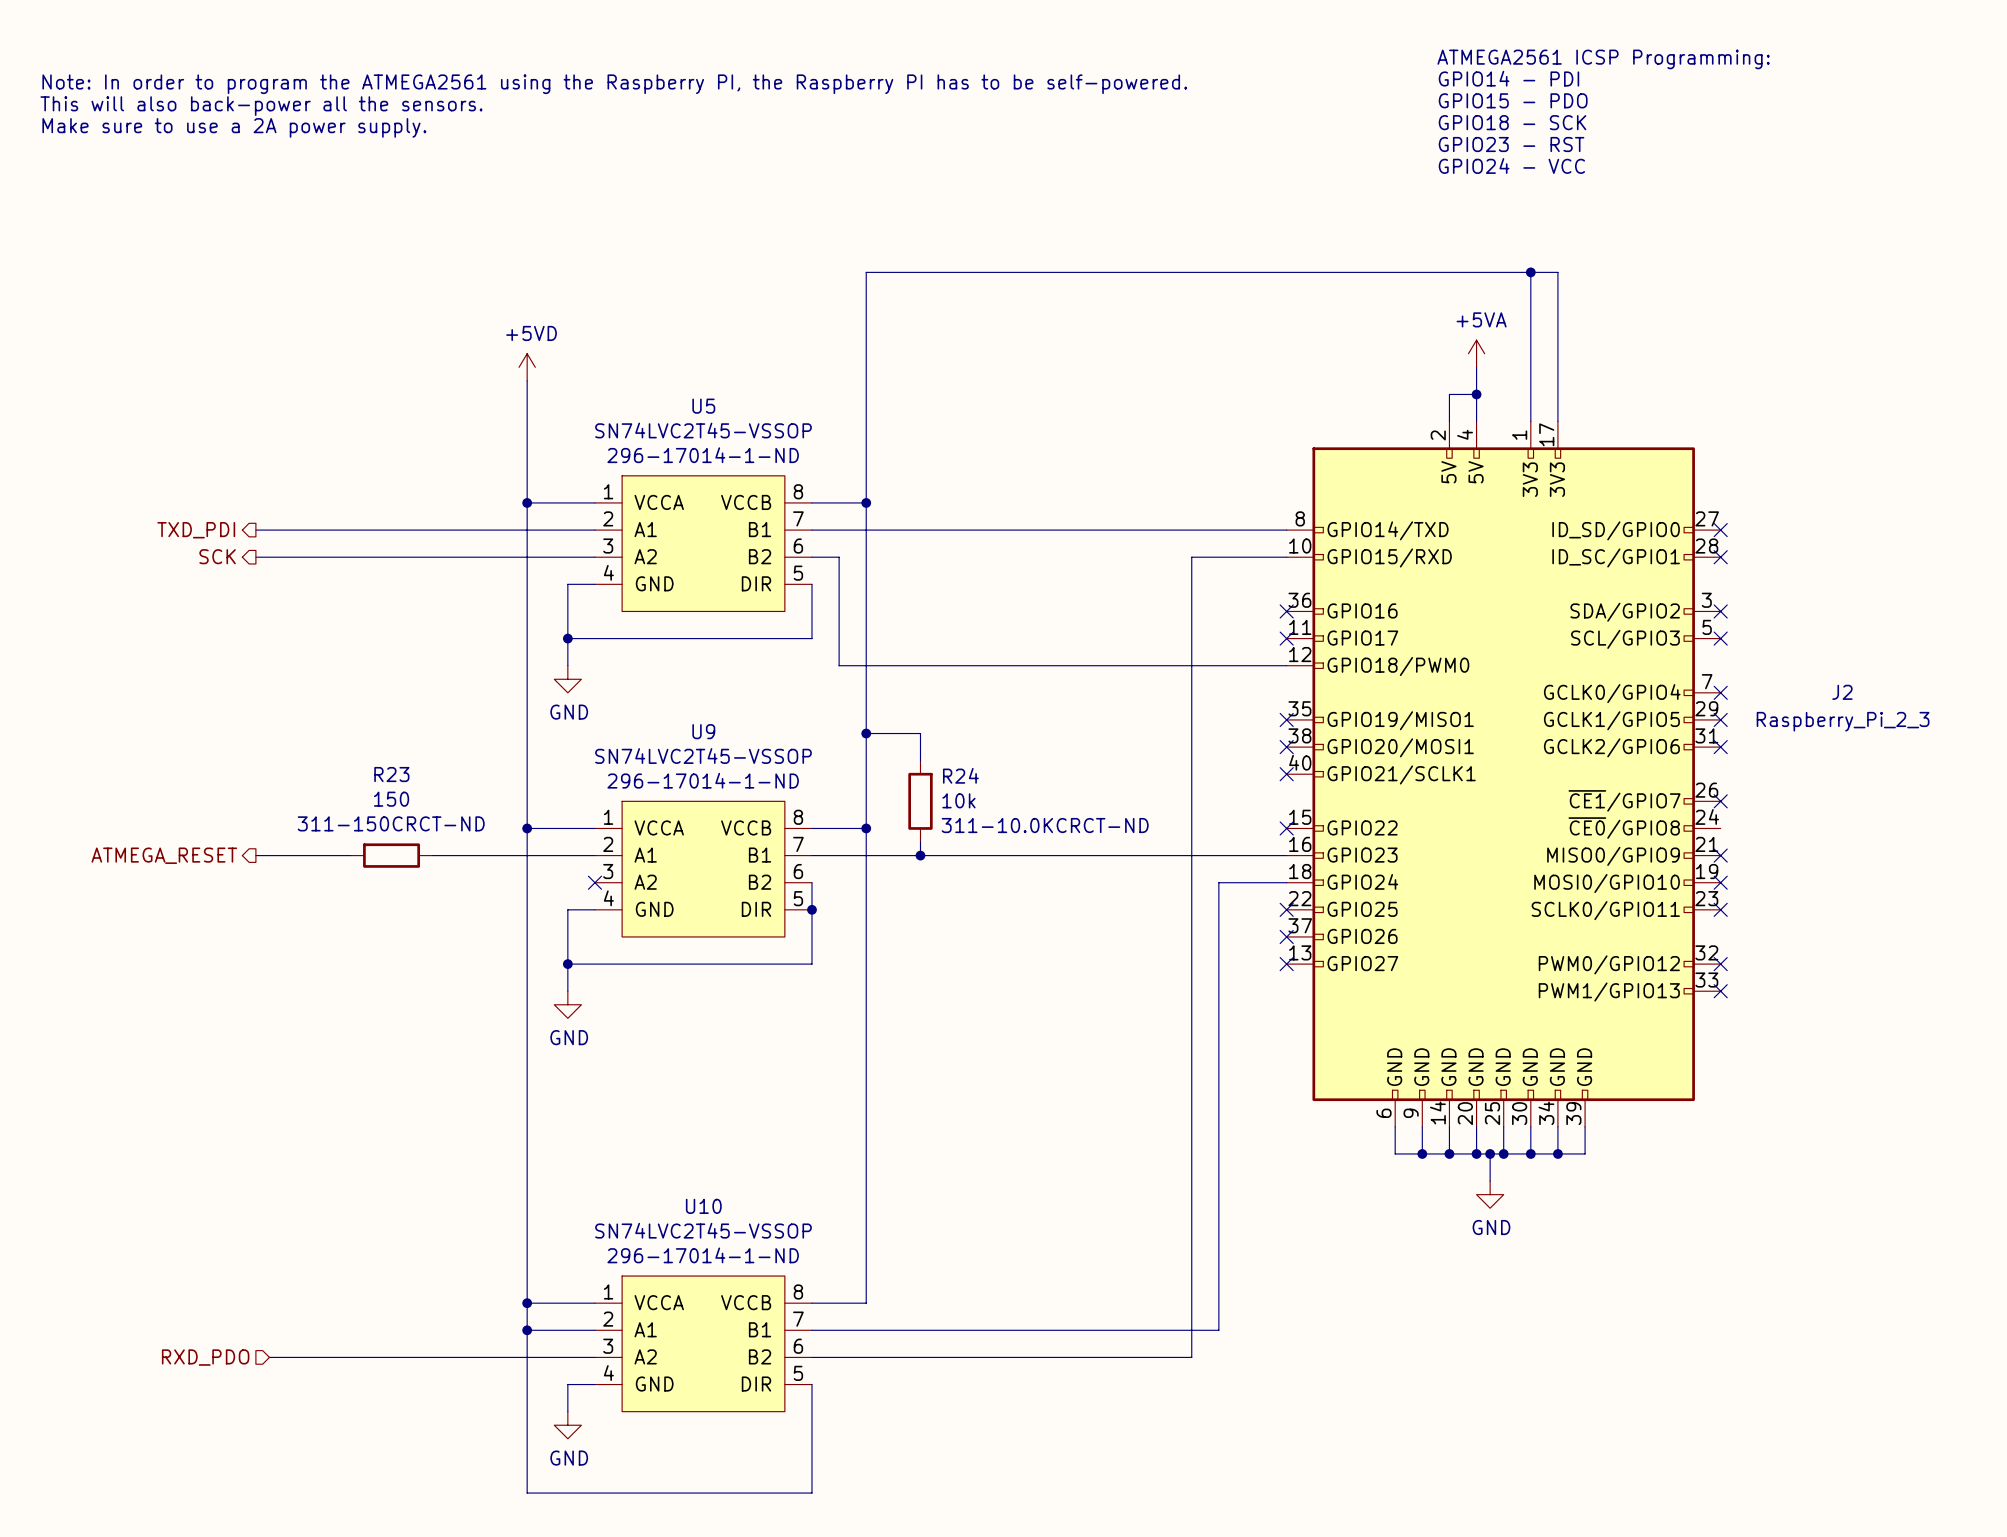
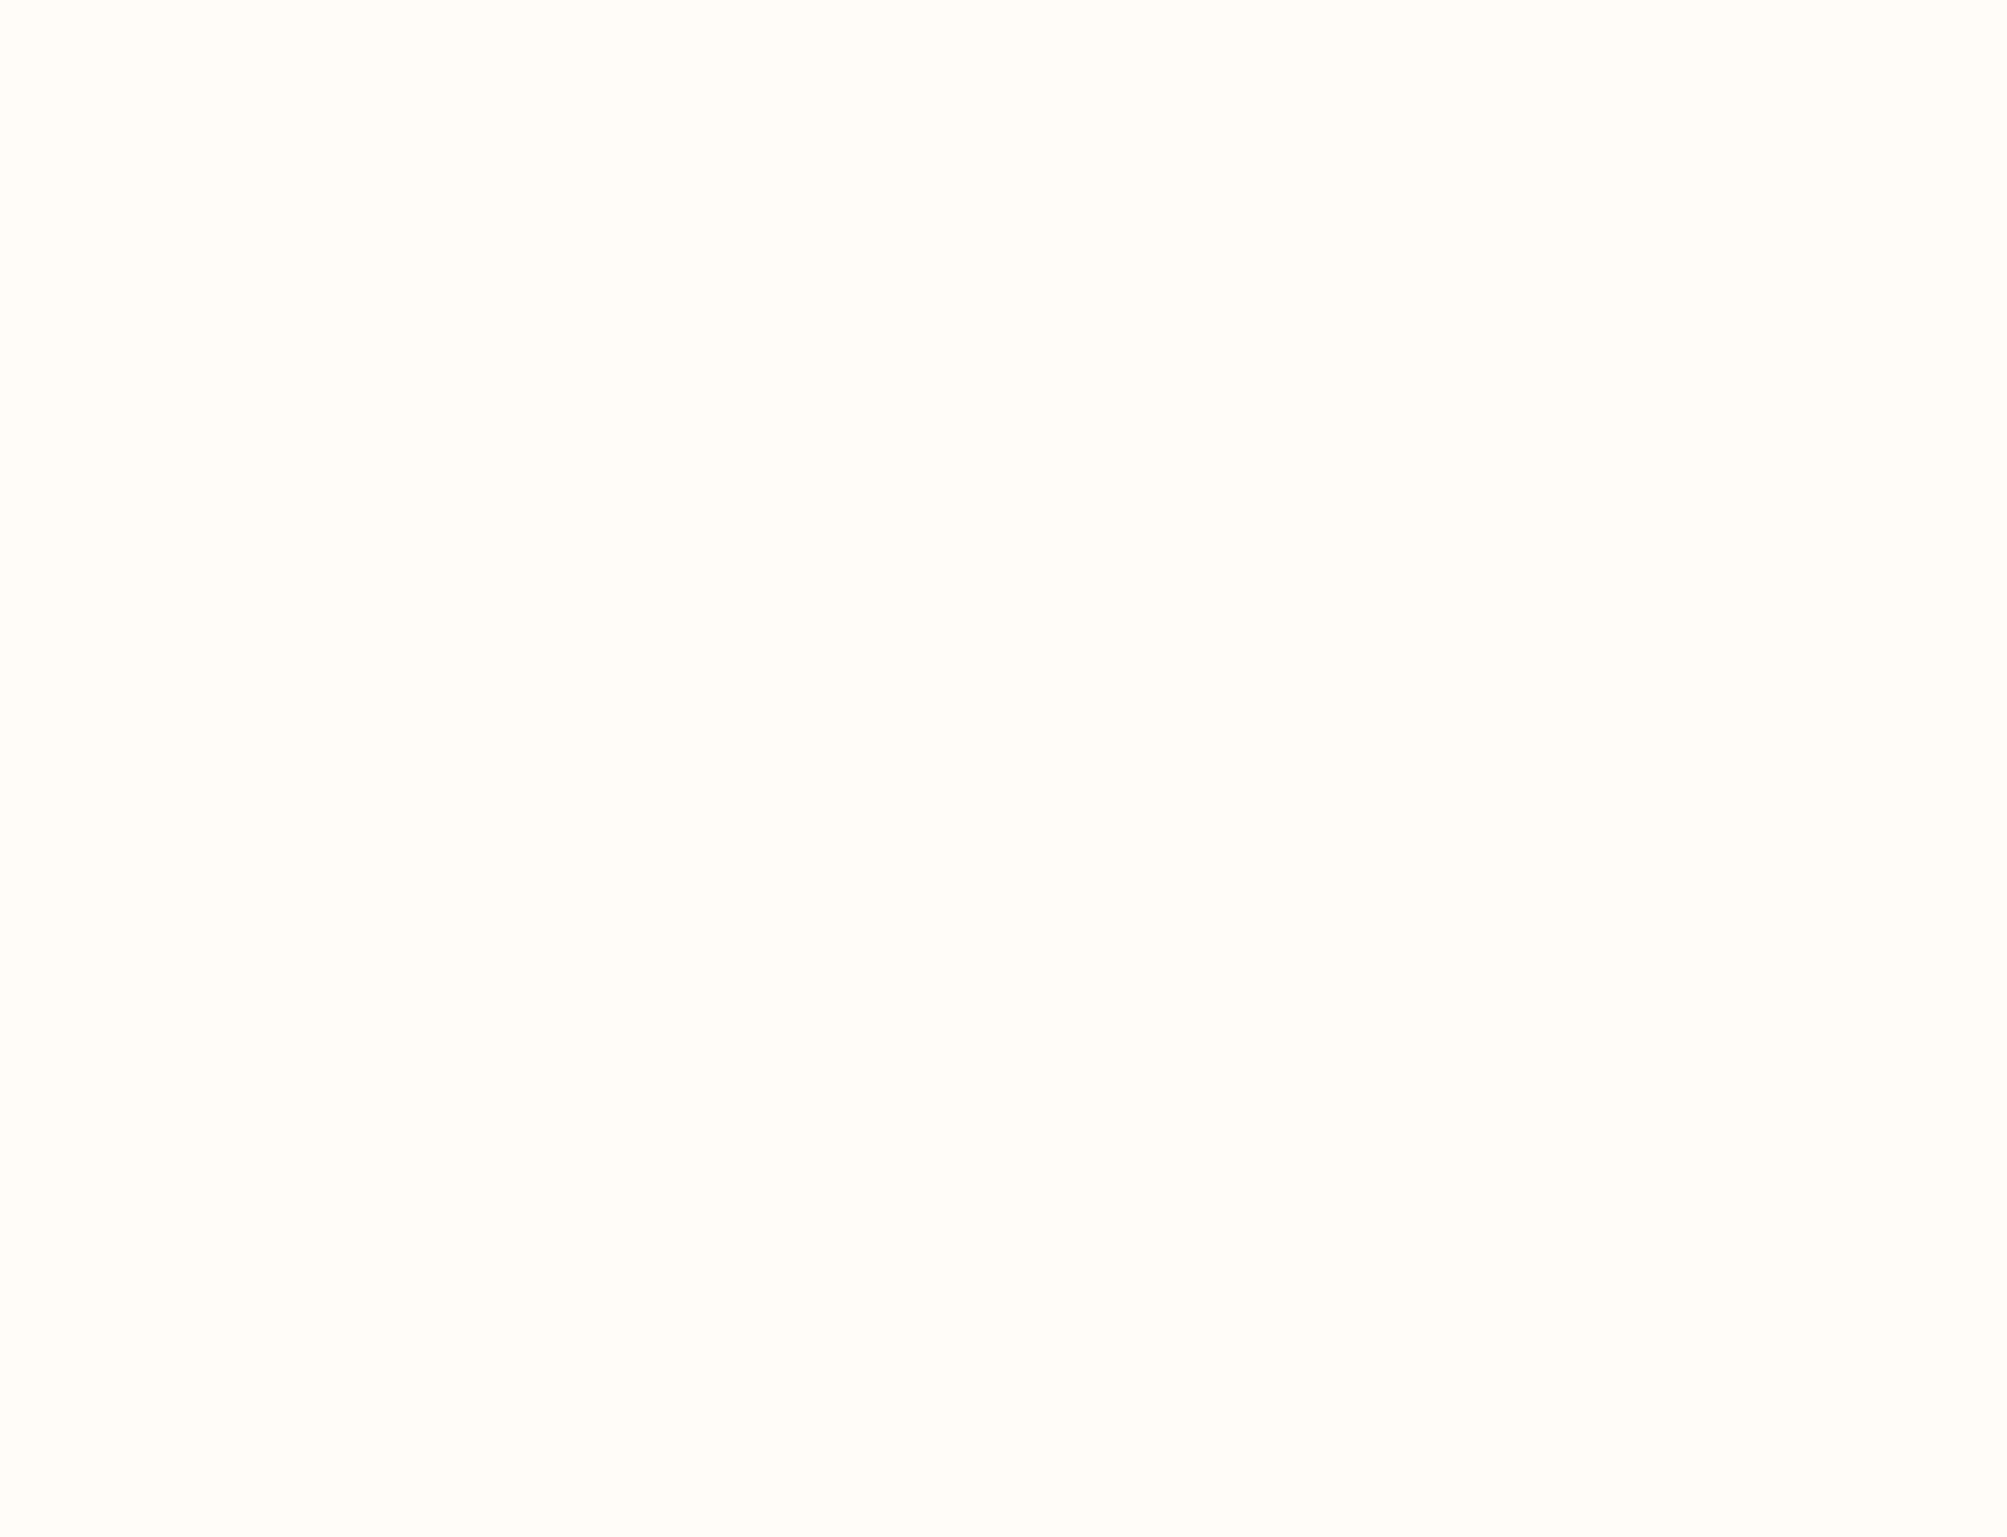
text: ATMEGA2561 ICSP Programming: (1603, 59) -> none
text: GPIO14 - PDI (1508, 78) -> none
text: Note: In order to program the ATMEGA2561 using the Raspberry PI, the Raspberry PI has to be self-powered. (614, 84) -> none
text: GPIO15 - PDO (1513, 100) -> none
text: This will also back-power all the sensors. (261, 106) -> none
text: GPIO18 - SCK (1512, 122) -> none
text: Make sure to use a 2A power supply. (234, 127) -> none
text: GPIO23 - RST (1511, 144) -> none
text: GPIO24 - VCC (1511, 166) -> none
wire: (1530, 272) (1530, 421) -> none
junction: (1530, 272) -> none
power symbol: +5VA (1476, 353) -> none
power symbol: +5VD (527, 367) -> none
wire: (1476, 367) (1476, 421) -> none
wire: (527, 380) (527, 1493) (811, 1493) (811, 1384) -> none
wire: (1476, 394) (1449, 394) (1449, 421) -> none
junction: (1476, 394) -> none
wire: (1557, 421) (1557, 272) (866, 272) (866, 1303) (811, 1303) -> none
wire: (527, 502) (594, 502) -> none
junction: (527, 502) -> none
wire: (811, 502) (866, 502) -> none
junction: (866, 502) -> none
hierarchical label: TXD_PDI (196, 530) -> none
wire: (255, 530) (594, 530) -> none
wire: (811, 530) (1286, 530) -> none
no-connect mark: (1720, 530) -> none
U5: SN74LVC2T45-VSSOP (703, 543) -> none
hierarchical label: SCK (217, 556) -> none
wire: (255, 557) (594, 557) -> none
wire: (811, 557) (839, 557) (839, 665) (1286, 665) -> none
wire: (1286, 557) (1191, 557) (1191, 1357) (811, 1357) -> none
no-connect mark: (1720, 557) -> none
wire: (594, 584) (567, 584) (567, 665) -> none
wire: (811, 584) (811, 638) (567, 638) -> none
no-connect mark: (1286, 611) -> none
no-connect mark: (1720, 611) -> none
junction: (567, 638) -> none
no-connect mark: (1286, 638) -> none
no-connect mark: (1720, 638) -> none
power symbol: GND (567, 679) -> none
no-connect mark: (1720, 692) -> none
no-connect mark: (1286, 719) -> none
no-connect mark: (1720, 719) -> none
wire: (866, 733) (920, 733) (920, 760) -> none
junction: (866, 733) -> none
no-connect mark: (1286, 747) -> none
no-connect mark: (1720, 747) -> none
no-connect mark: (1286, 774) -> none
J2: Raspberry_Pi_2_3 (1503, 774) -> none
R24: 10k (920, 801) -> none
no-connect mark: (1720, 801) -> none
wire: (527, 828) (594, 828) -> none
junction: (527, 828) -> none
wire: (811, 828) (866, 828) -> none
junction: (866, 828) -> none
no-connect mark: (1286, 828) -> none
wire: (920, 842) (920, 855) -> none
hierarchical label: ATMEGA_RESET (164, 855) -> none
wire: (255, 855) (350, 855) -> none
R23: 150 (391, 855) -> none
wire: (432, 855) (594, 855) -> none
wire: (811, 855) (1286, 855) -> none
junction: (920, 855) -> none
no-connect mark: (1720, 855) -> none
U9: SN74LVC2T45-VSSOP (703, 869) -> none
no-connect mark: (594, 882) -> none
wire: (811, 882) (811, 964) (567, 964) -> none
wire: (1286, 882) (1218, 882) (1218, 1330) (811, 1330) -> none
no-connect mark: (1720, 882) -> none
wire: (594, 909) (567, 909) (567, 991) -> none
junction: (811, 909) -> none
no-connect mark: (1286, 909) -> none
no-connect mark: (1720, 909) -> none
no-connect mark: (1286, 936) -> none
junction: (567, 964) -> none
no-connect mark: (1286, 964) -> none
no-connect mark: (1720, 964) -> none
no-connect mark: (1720, 991) -> none
power symbol: GND (567, 1004) -> none
wire: (1395, 1126) (1395, 1153) (1585, 1153) (1585, 1126) -> none
wire: (1422, 1126) (1422, 1153) -> none
wire: (1449, 1126) (1449, 1153) -> none
wire: (1476, 1126) (1476, 1153) -> none
wire: (1503, 1126) (1503, 1153) -> none
wire: (1530, 1126) (1530, 1153) -> none
wire: (1557, 1126) (1557, 1153) -> none
junction: (1422, 1153) -> none
junction: (1449, 1153) -> none
junction: (1476, 1153) -> none
wire: (1490, 1153) (1490, 1181) -> none
junction: (1490, 1153) -> none
junction: (1503, 1153) -> none
junction: (1530, 1153) -> none
junction: (1557, 1153) -> none
power symbol: GND (1490, 1194) -> none
wire: (527, 1303) (594, 1303) -> none
junction: (527, 1303) -> none
wire: (527, 1330) (594, 1330) -> none
junction: (527, 1330) -> none
U10: SN74LVC2T45-VSSOP (703, 1343) -> none
hierarchical label: RXD_PDO (205, 1357) -> none
wire: (269, 1357) (594, 1357) -> none
wire: (594, 1384) (567, 1384) (567, 1411) -> none
power symbol: GND (567, 1425) -> none

